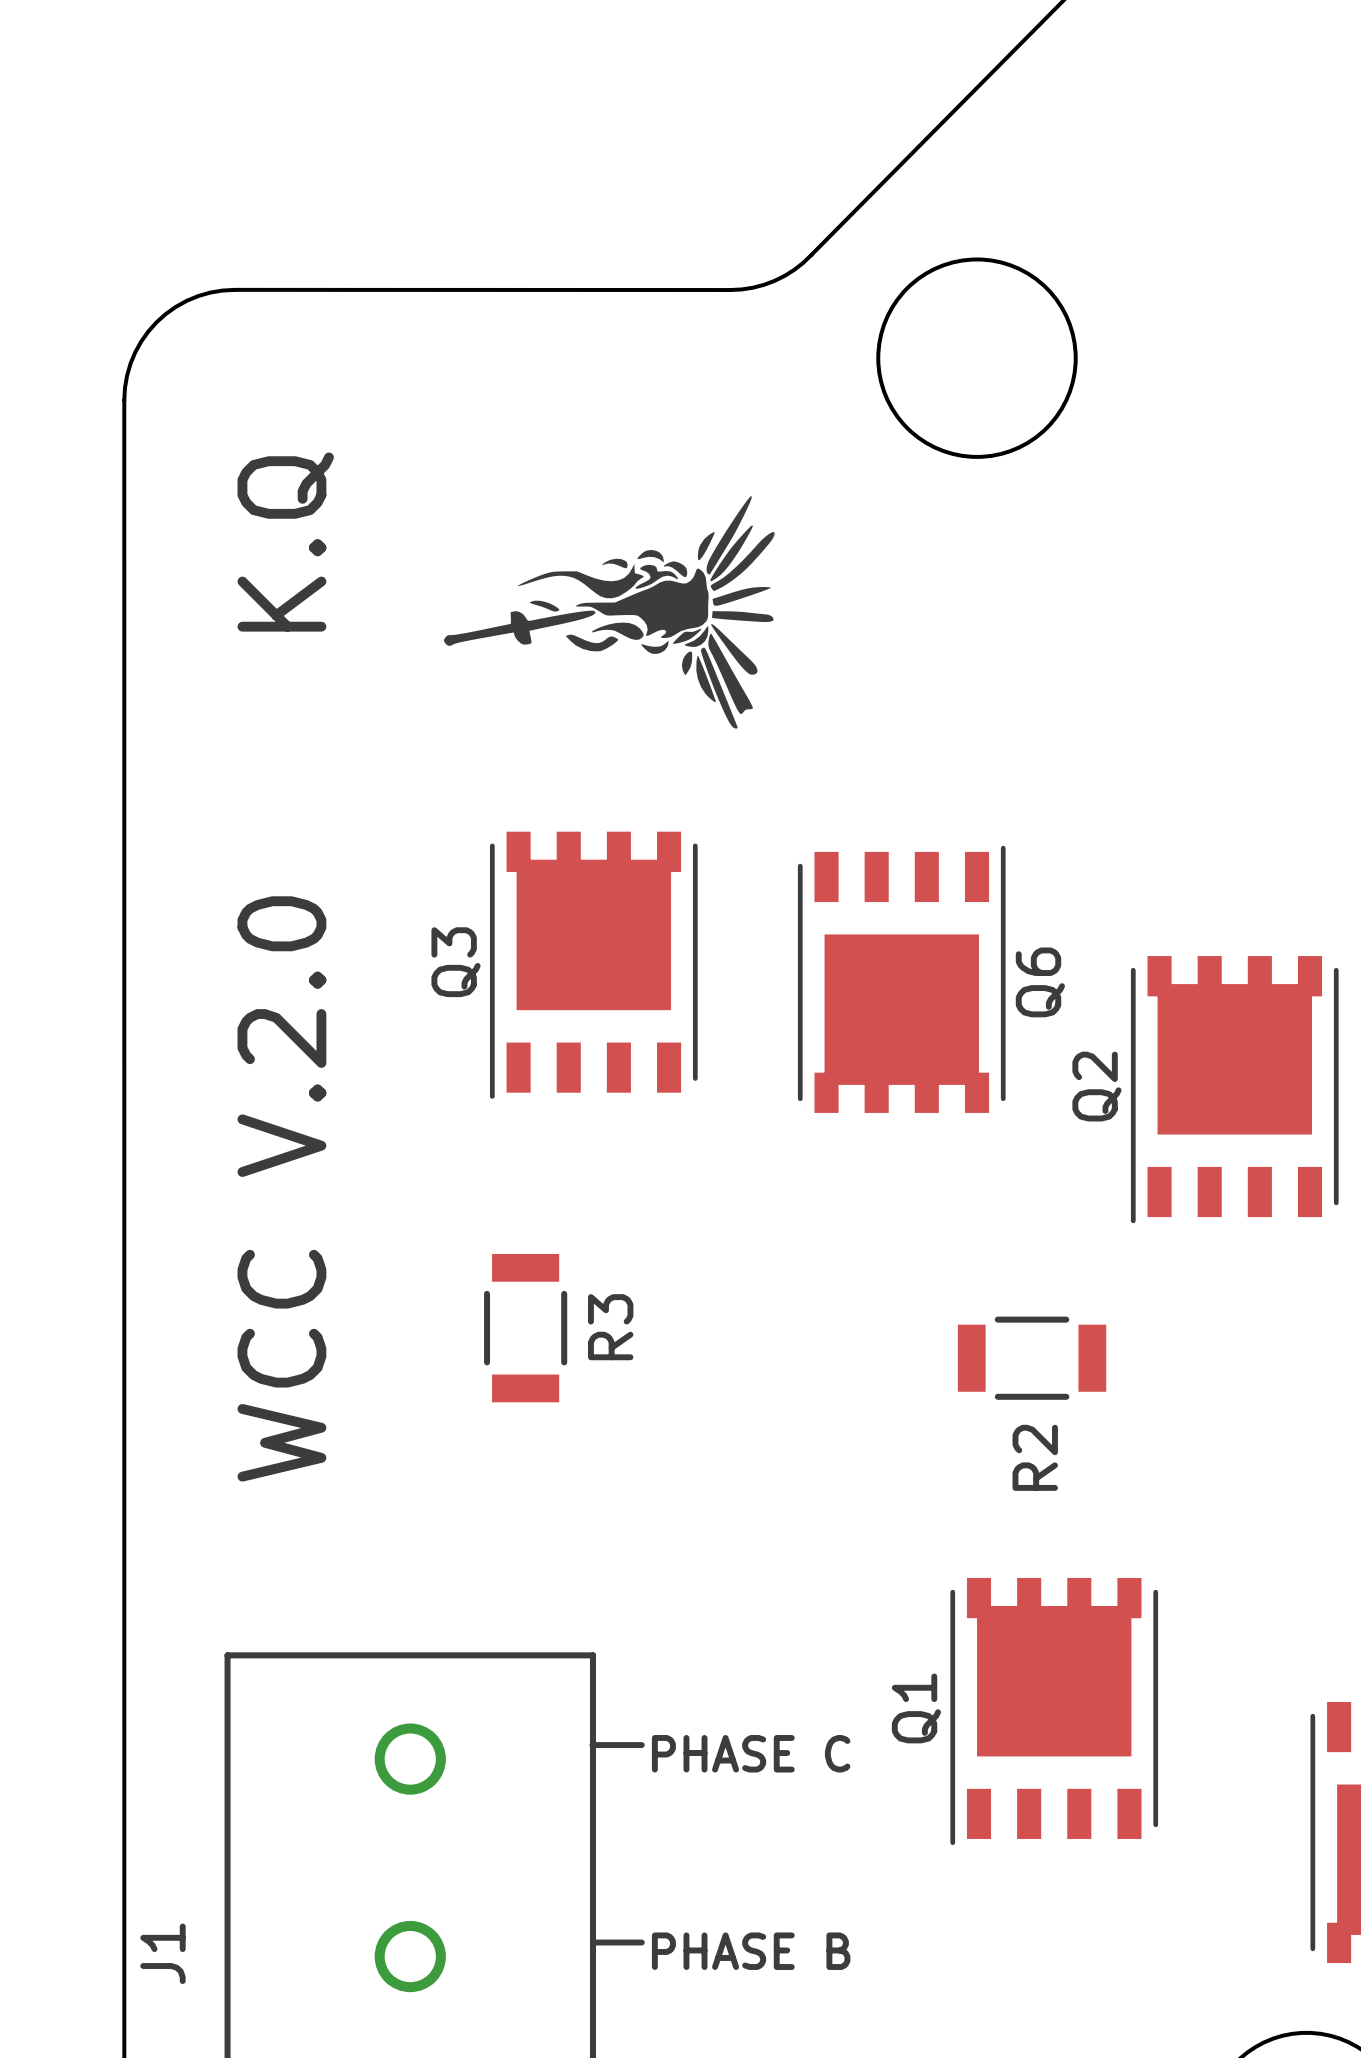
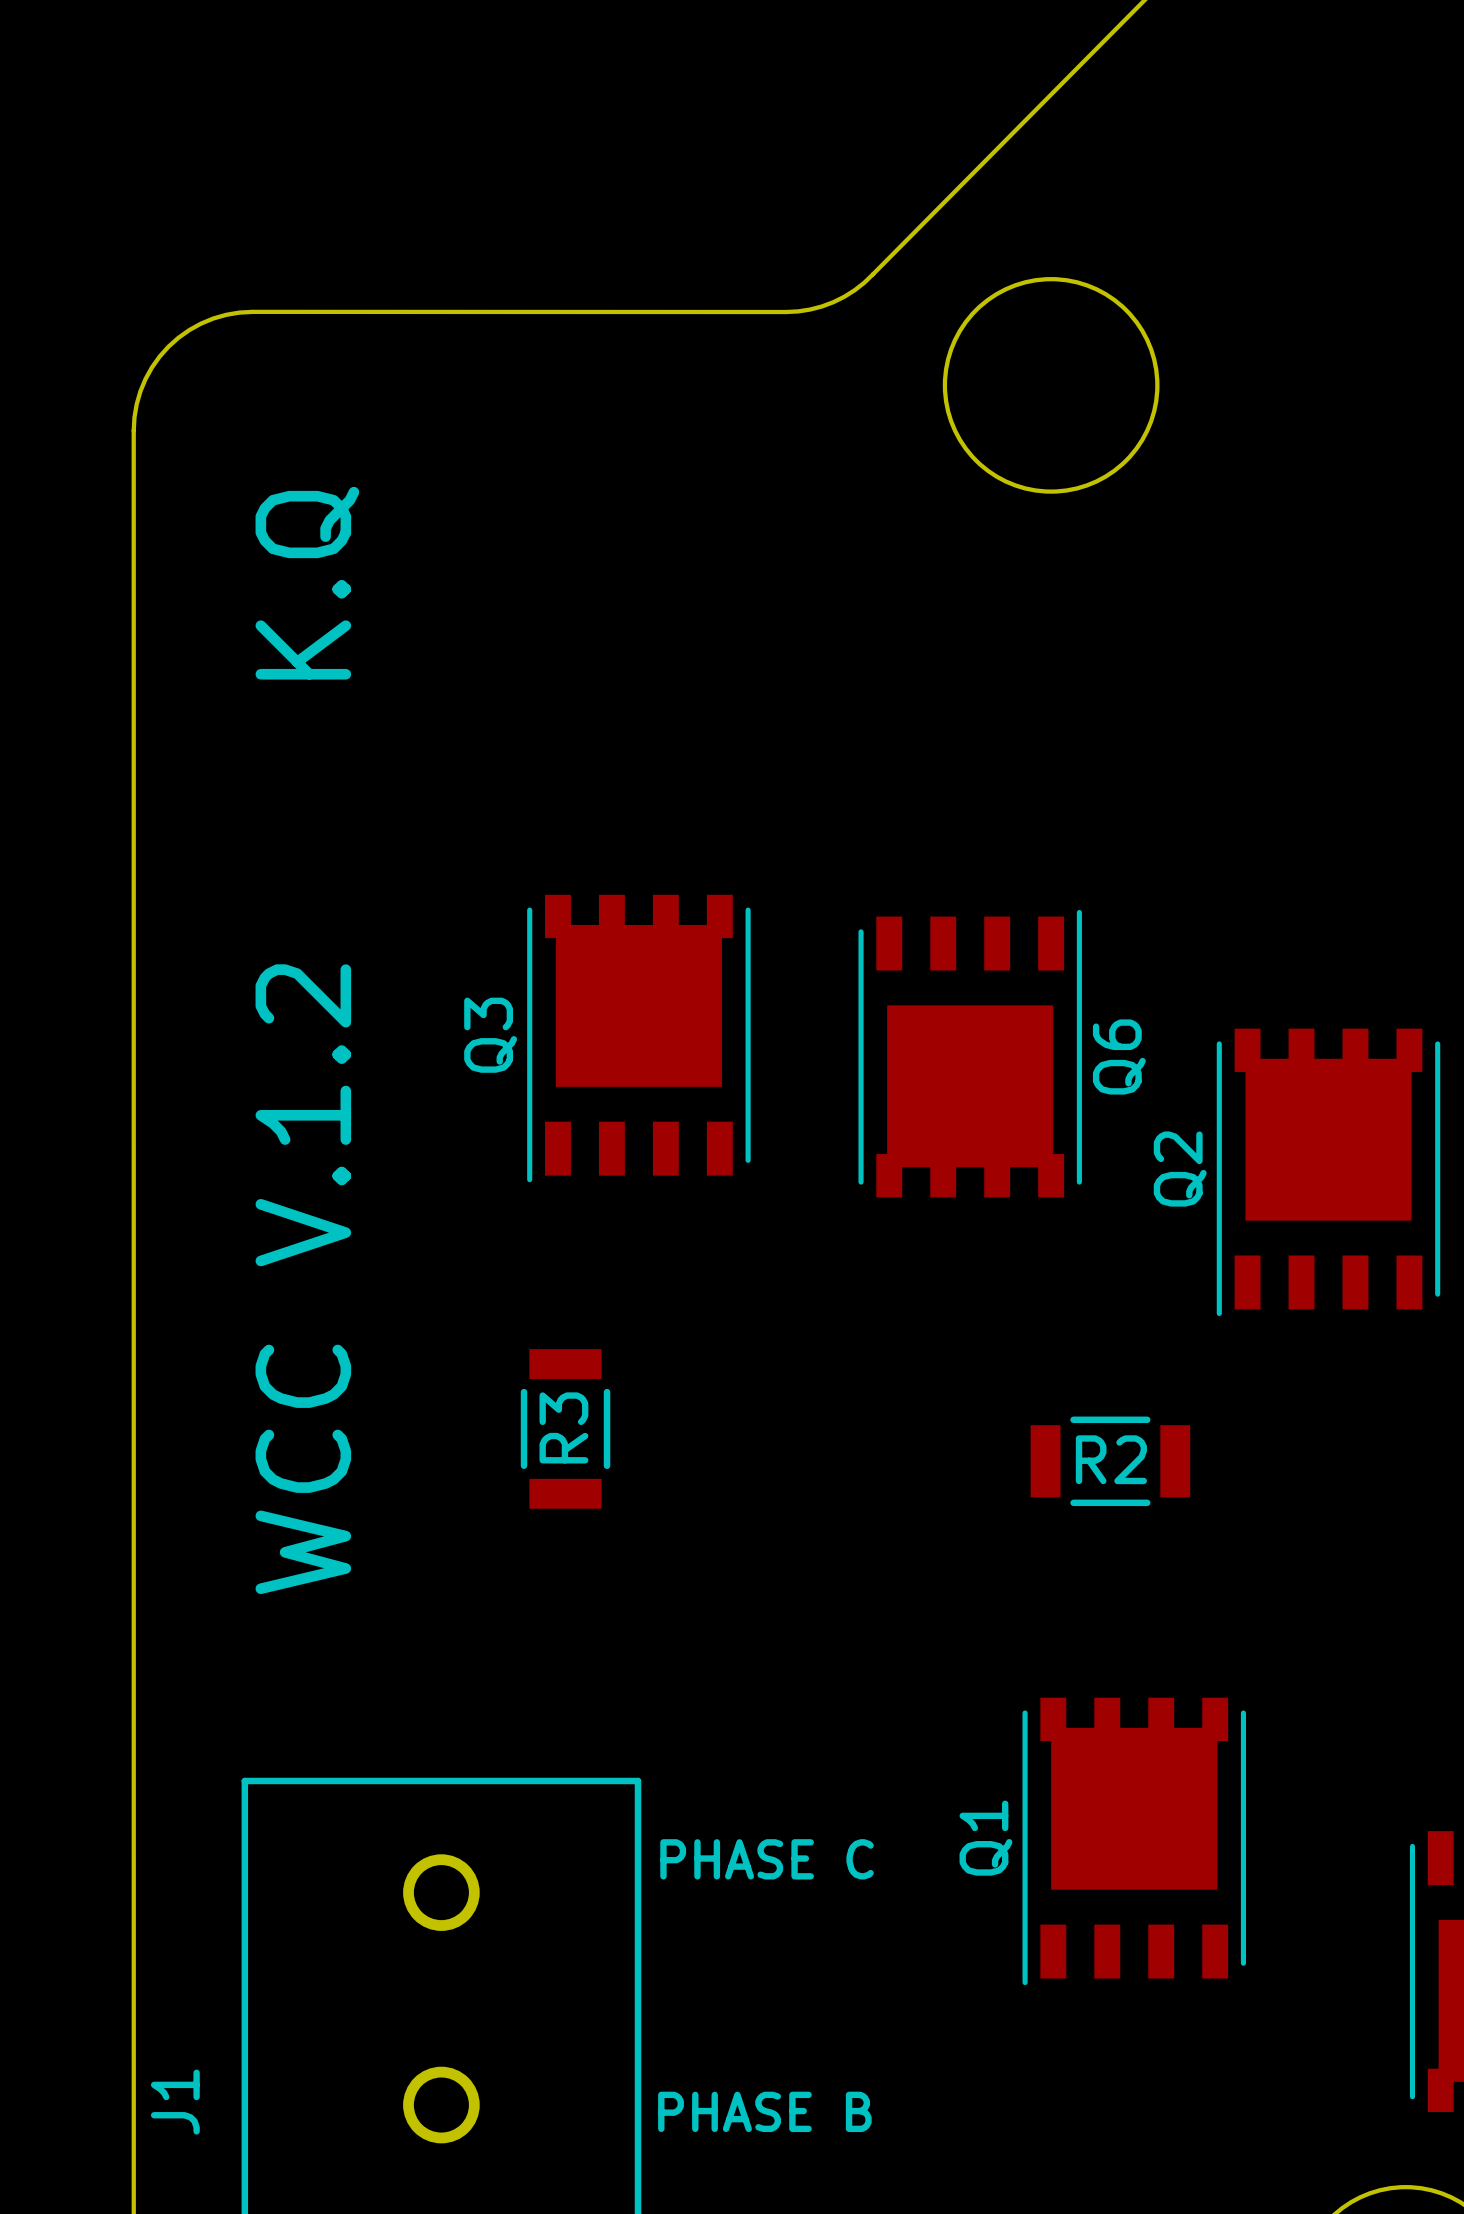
drawing: [443, 496, 775, 729] -> none
text: WCC V.2.0 K.Q (285, 967) -> WCC V.1.2 K.Q (307, 1040)
R3 name position: R3 (610, 1327) -> R3 (563, 1427)
R2 name rotation: 0° (1035, 1457) -> 90° clockwise (1111, 1459)
R2 name position: R2 (1035, 1457) -> R2 (1111, 1459)
line: (592, 1745) (641, 1745) -> none
text position: PHASE C (751, 1753) -> PHASE C (767, 1859)
line: (592, 1942) (641, 1942) -> none
text position: PHASE B (751, 1951) -> PHASE B (764, 2111)

